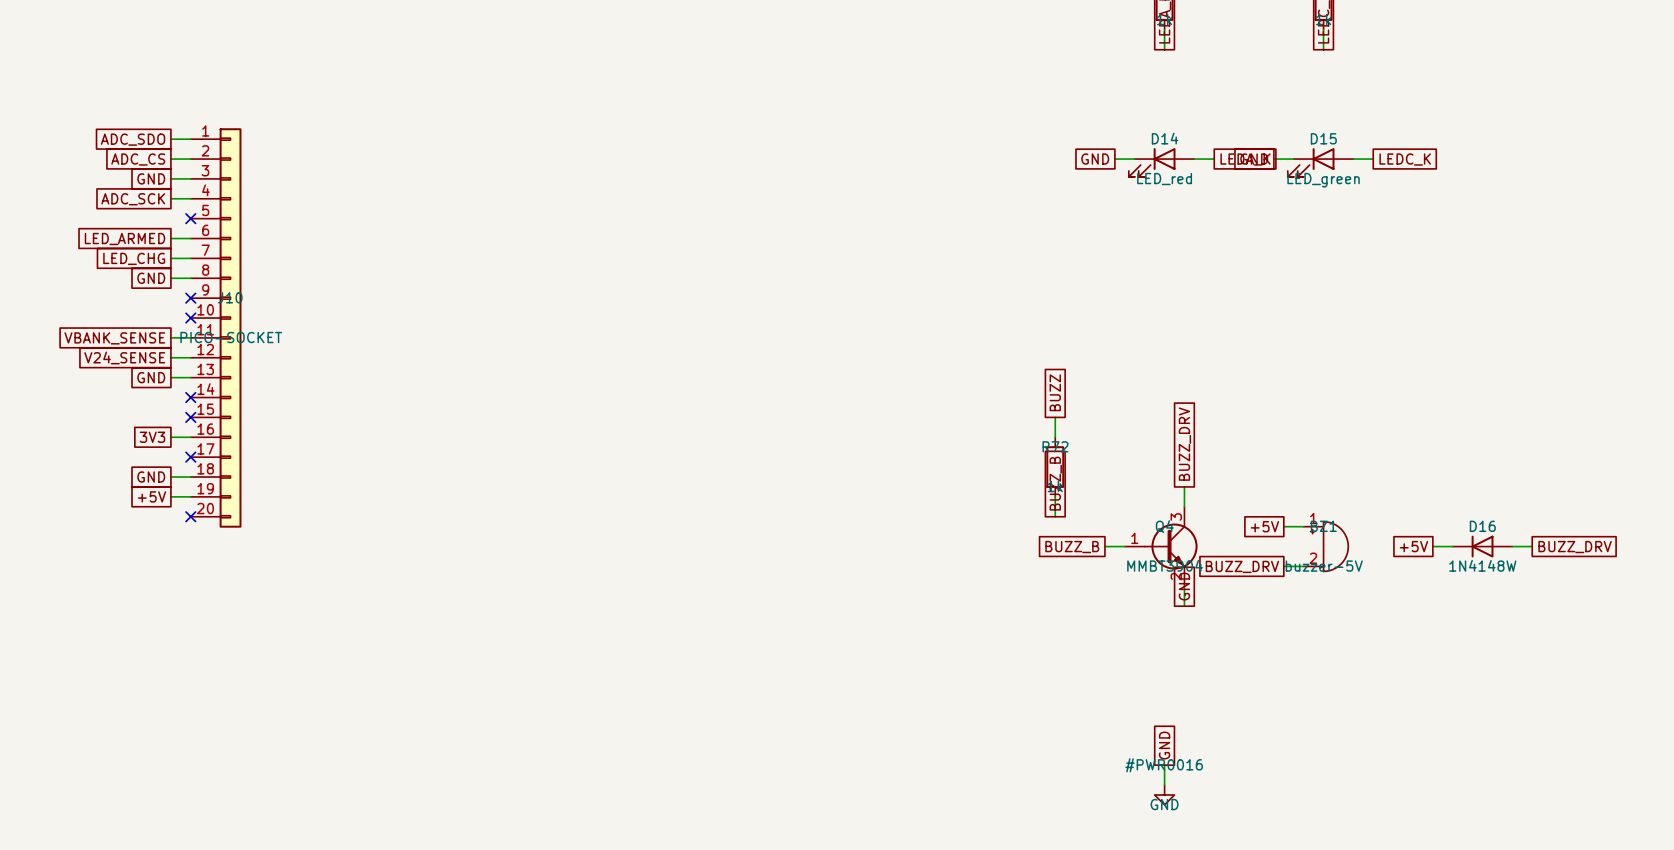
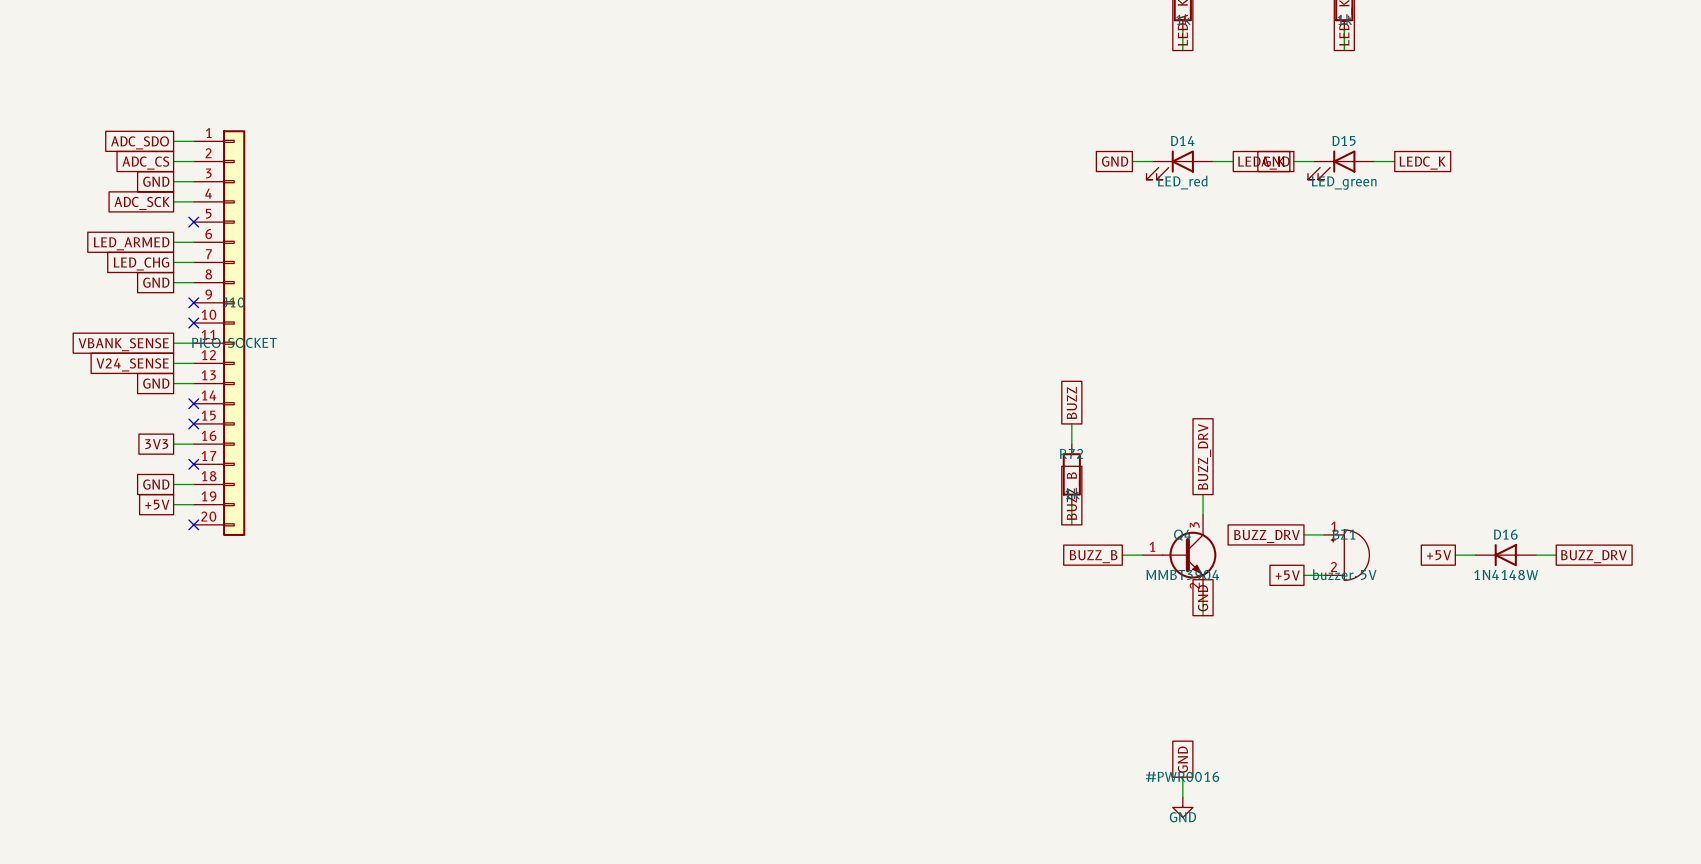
global label: +5V (1264, 526) -> BUZZ_DRV (1266, 536)
global label: BUZZ_DRV (1242, 566) -> +5V (1287, 575)

